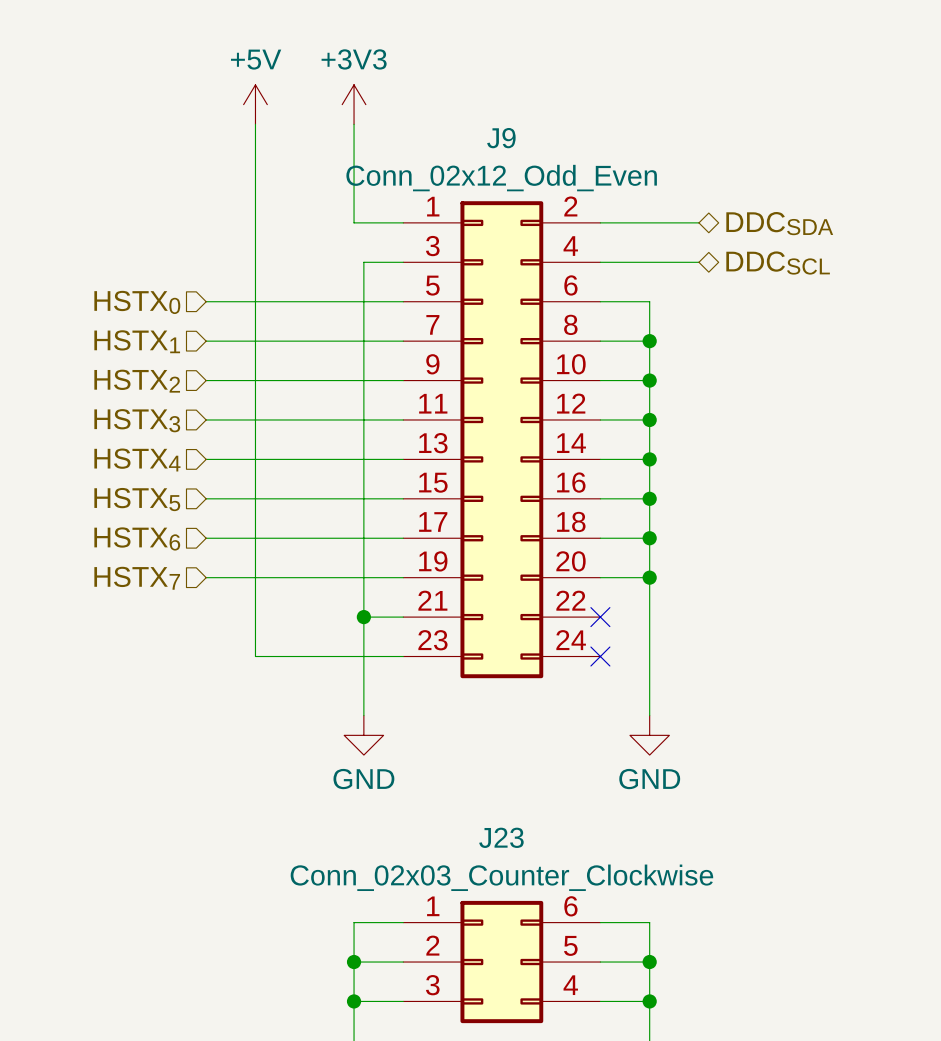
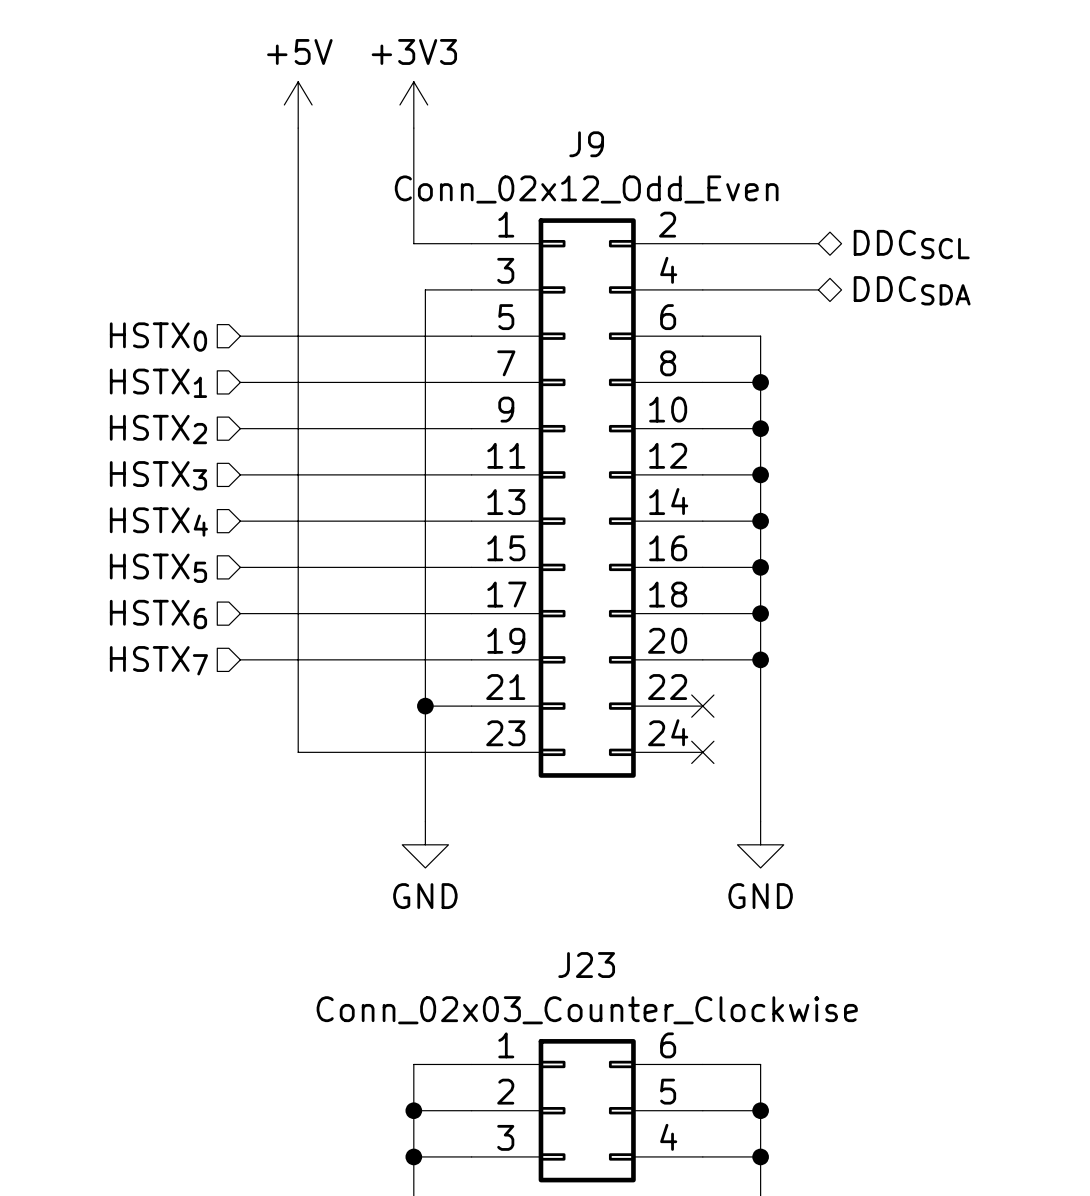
hierarchical label: DDCSDA (779, 223) -> DDCSCL (911, 244)
hierarchical label: DDCSCL (778, 263) -> DDCSDA (912, 290)

